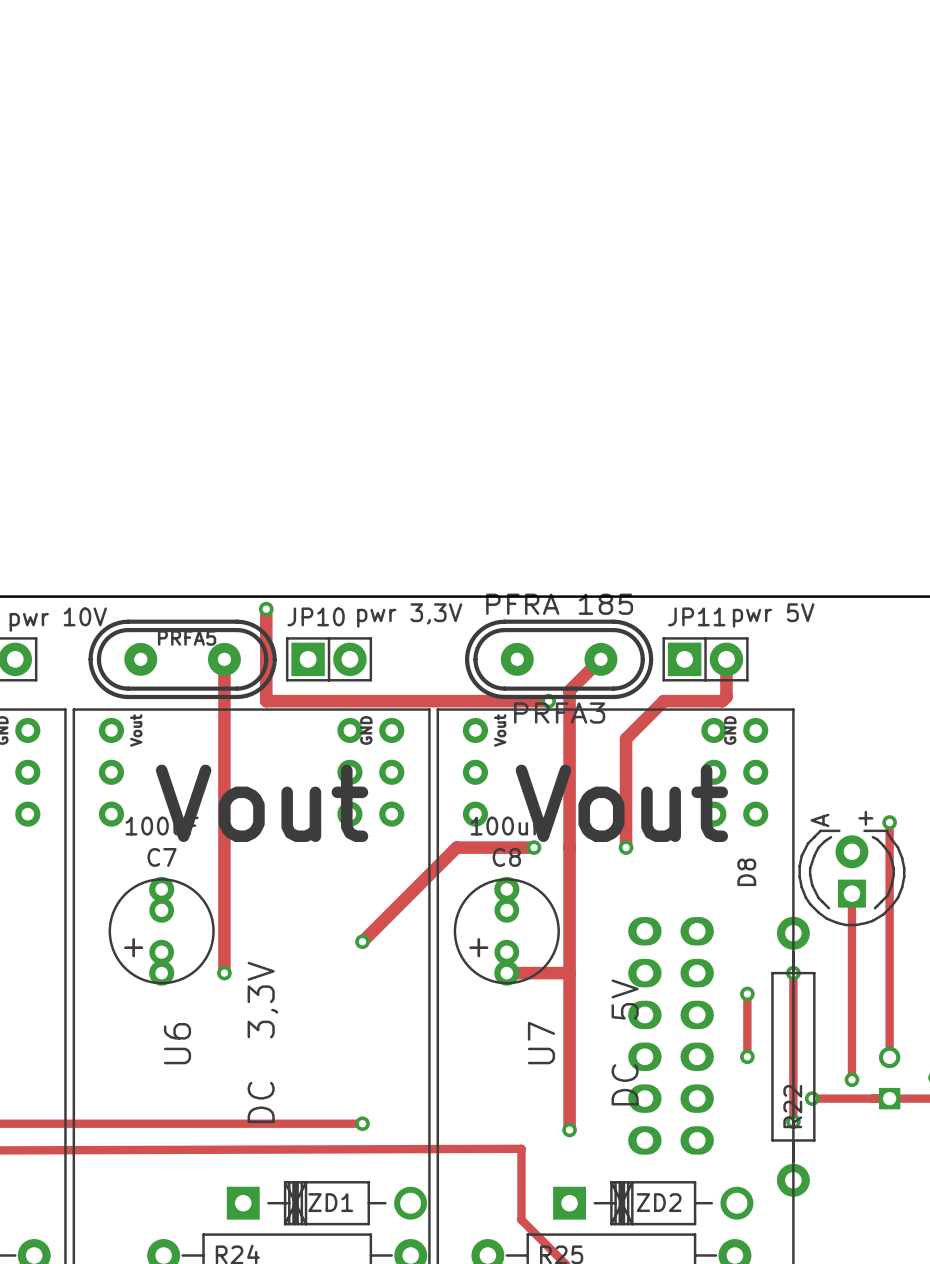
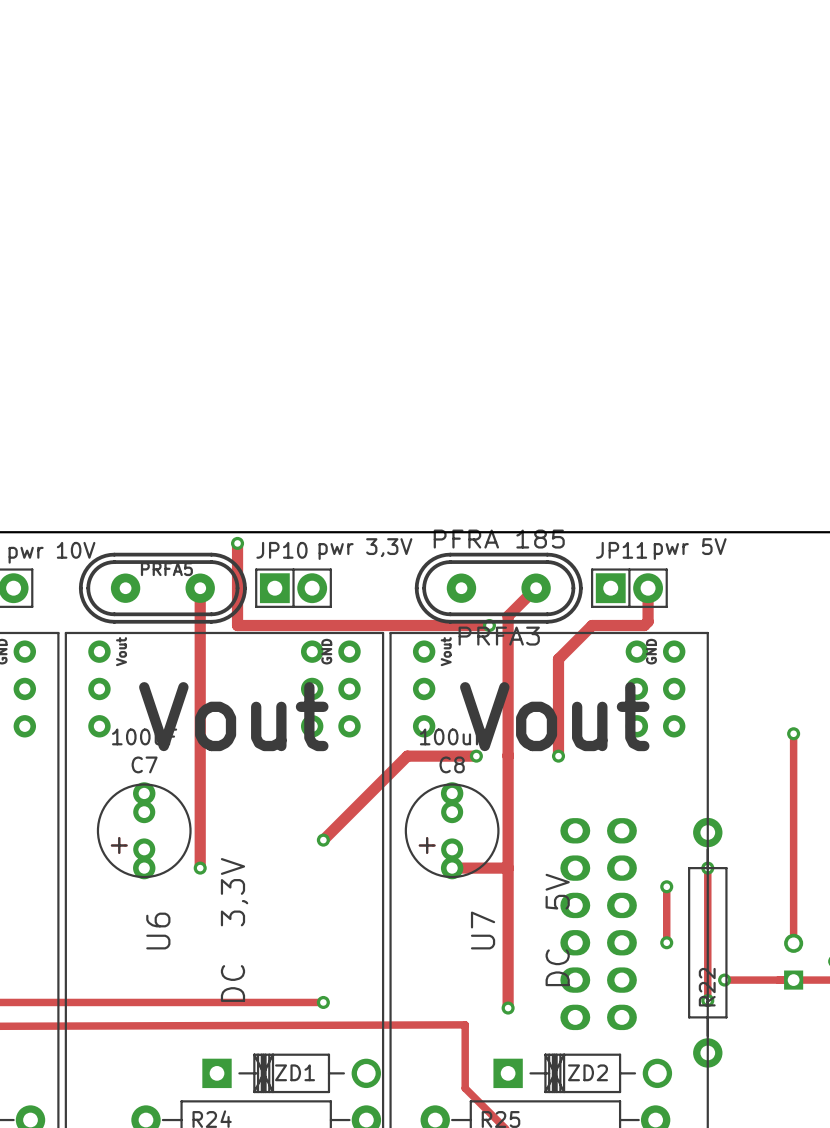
D8: (851, 877) -> none
track: (851, 893) (851, 1079) -> none
via: (851, 1079) -> none

